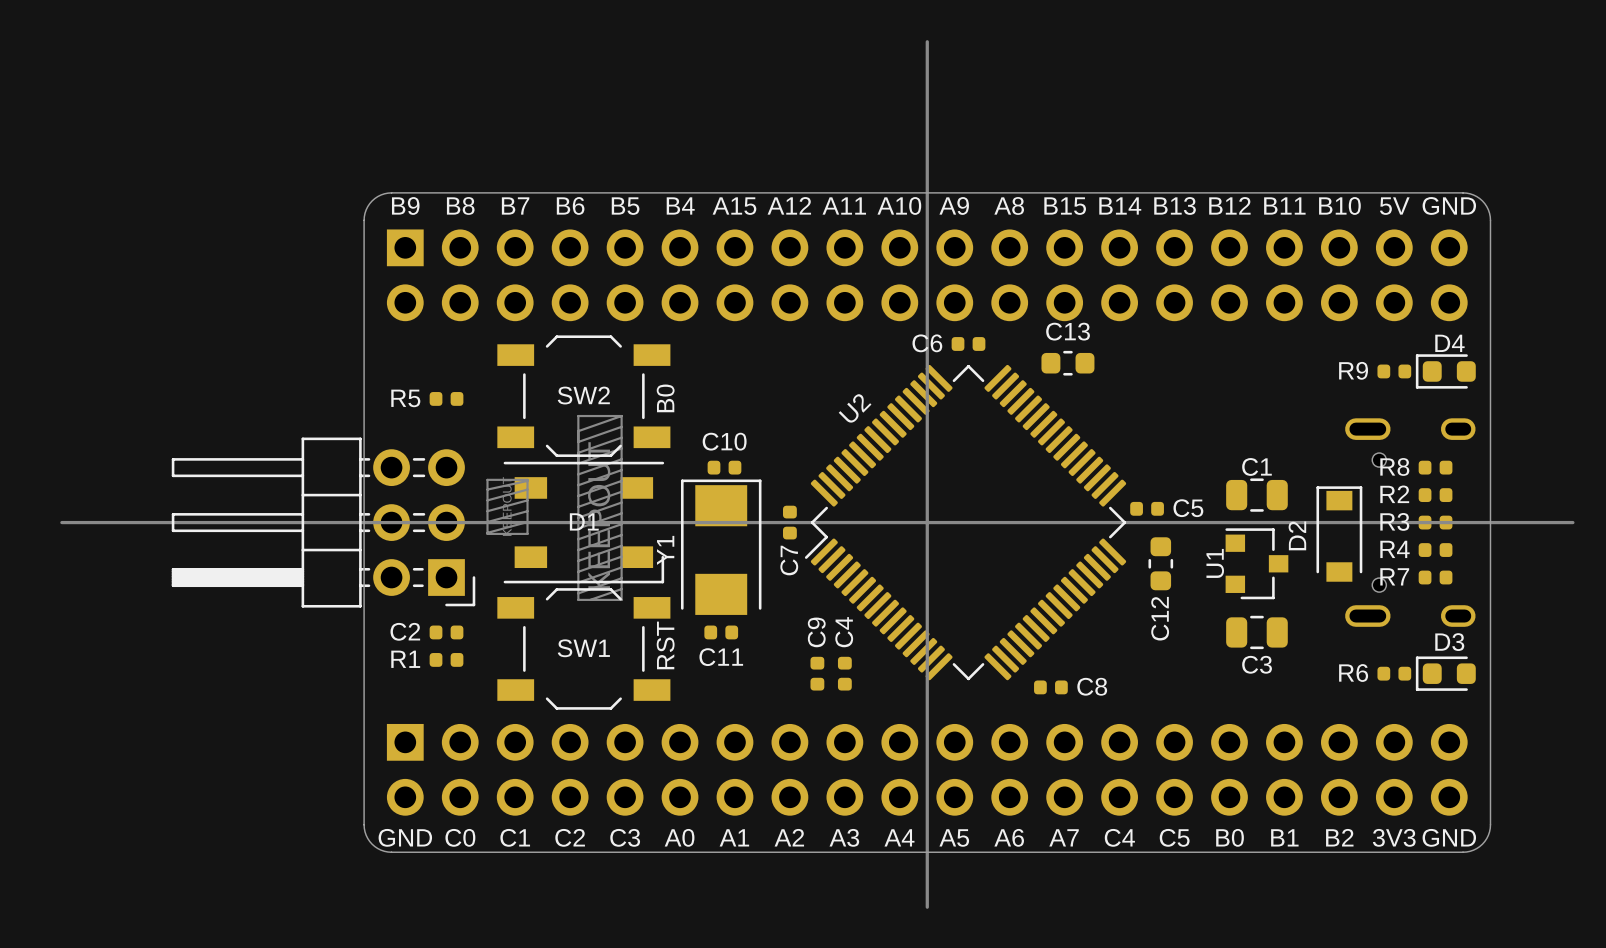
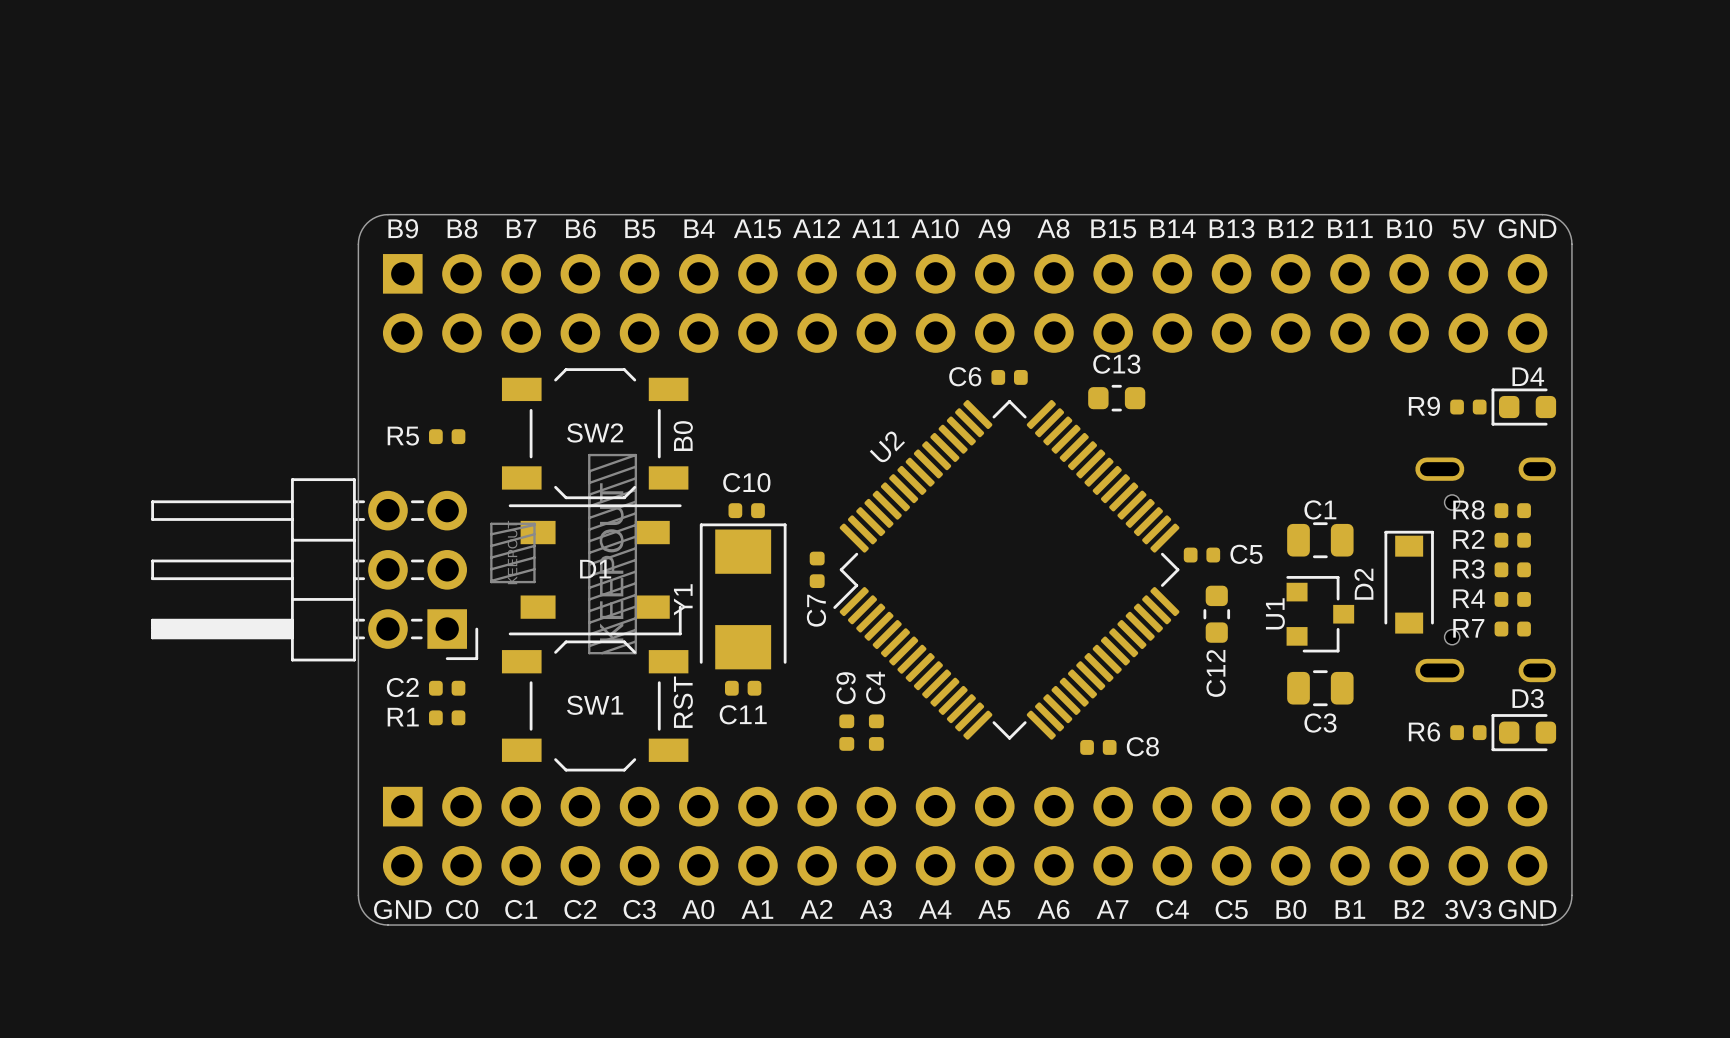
line: (927, 41) (927, 907) -> none
line: (61, 522) (1572, 522) -> none

